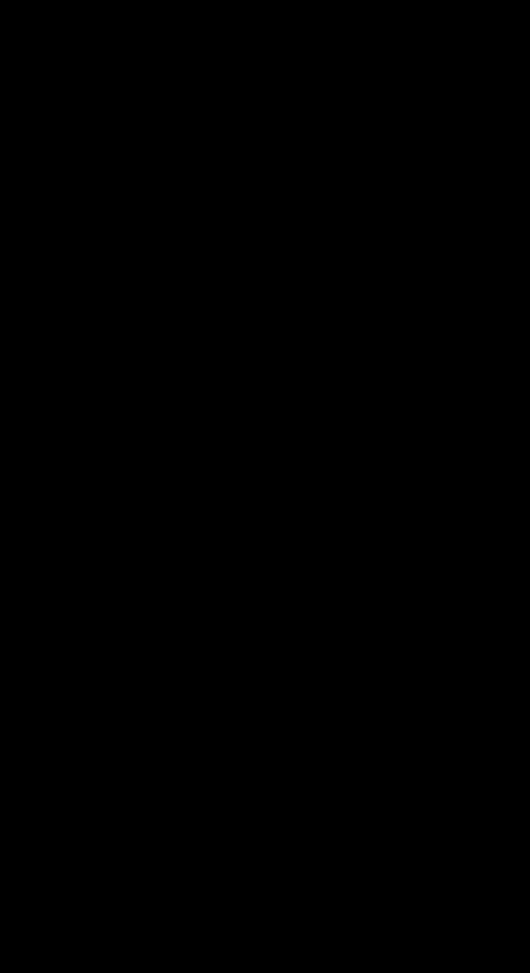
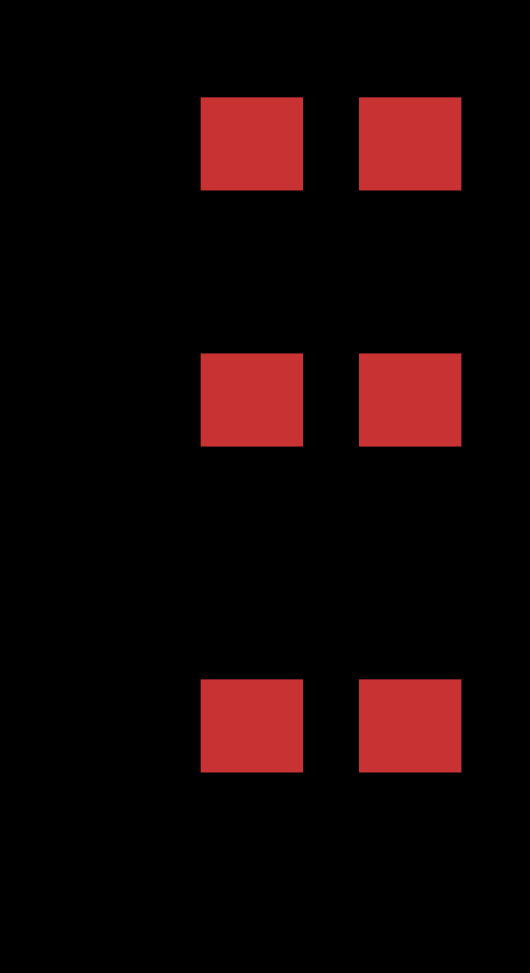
part: none -> (331, 143)
part: none -> (331, 399)
part: none -> (331, 725)

